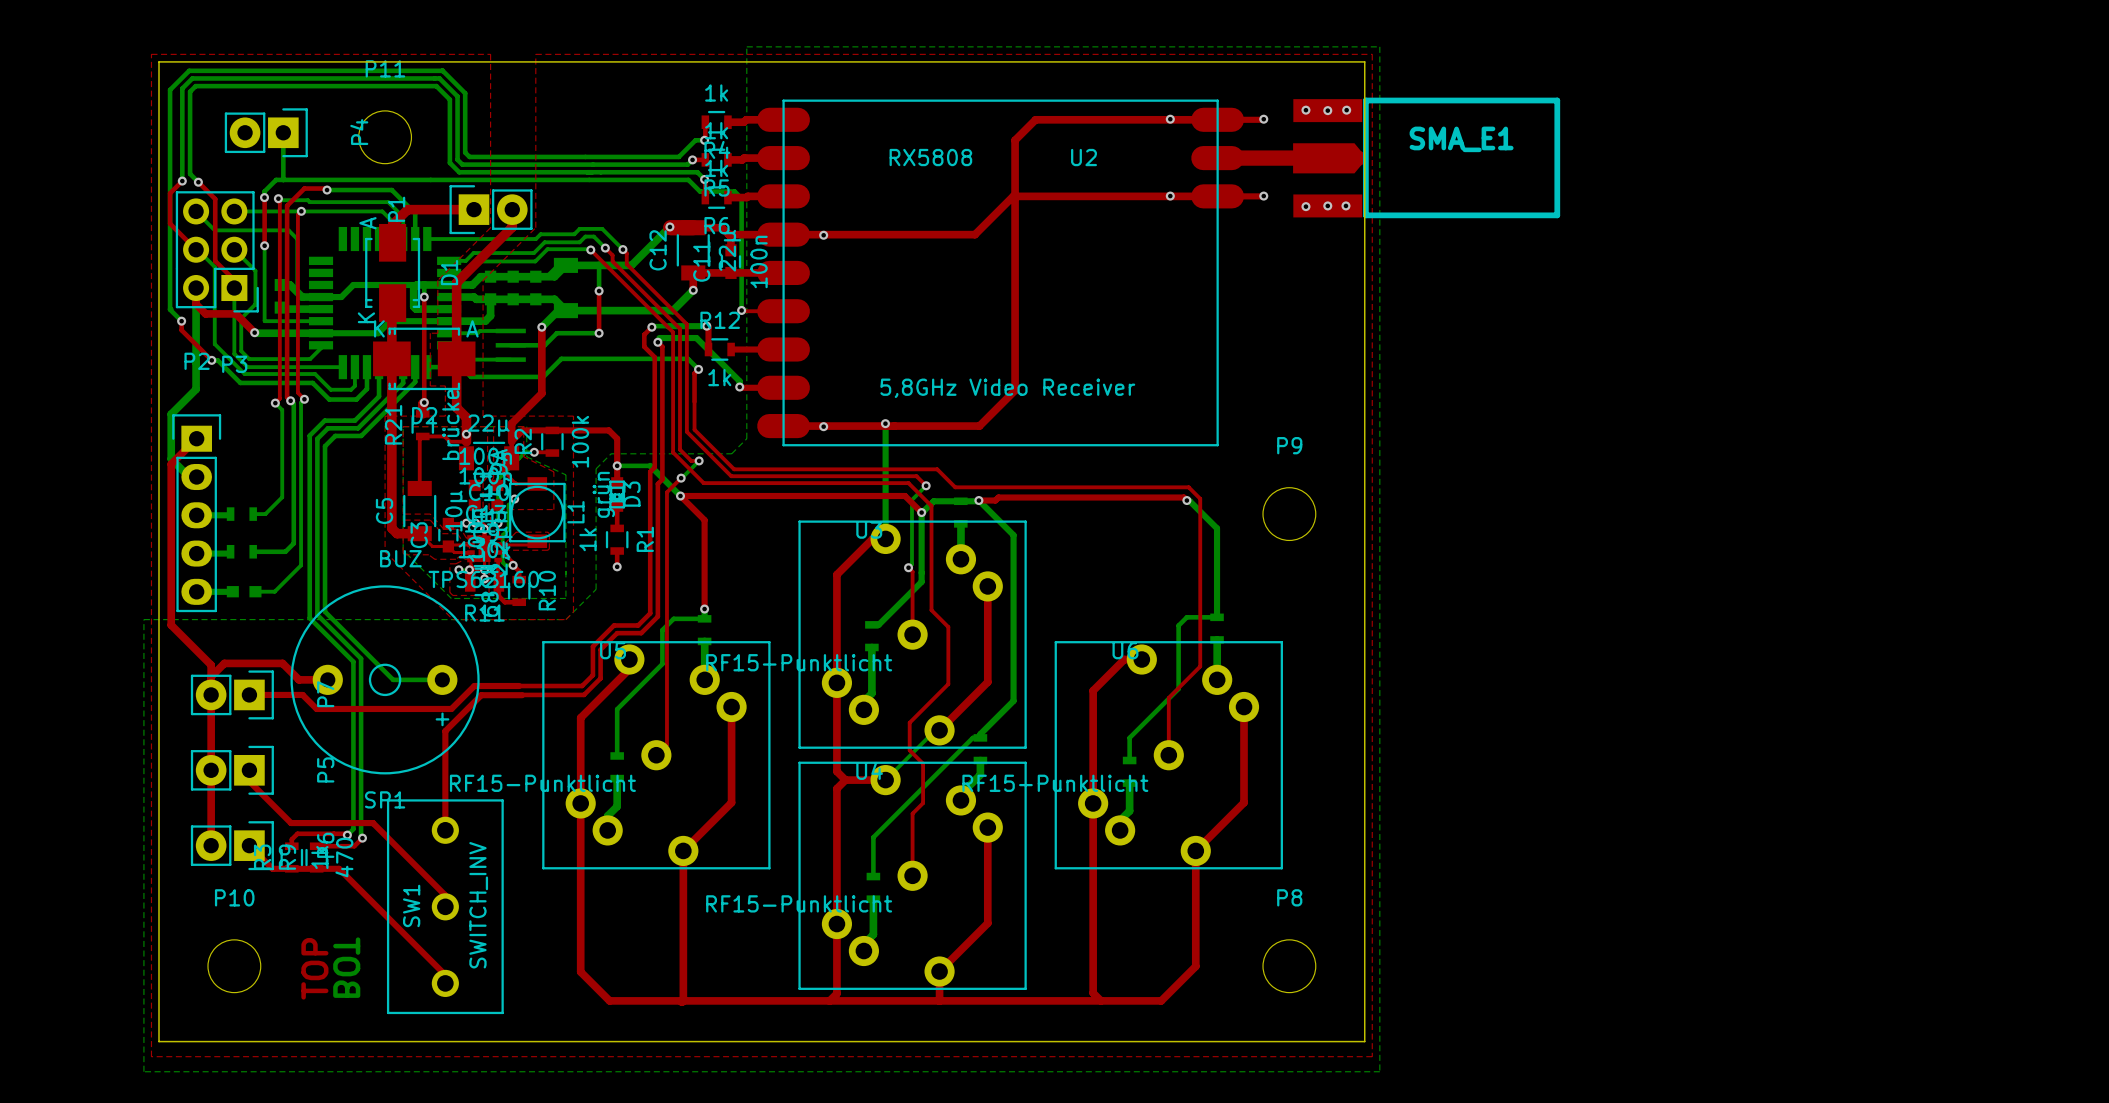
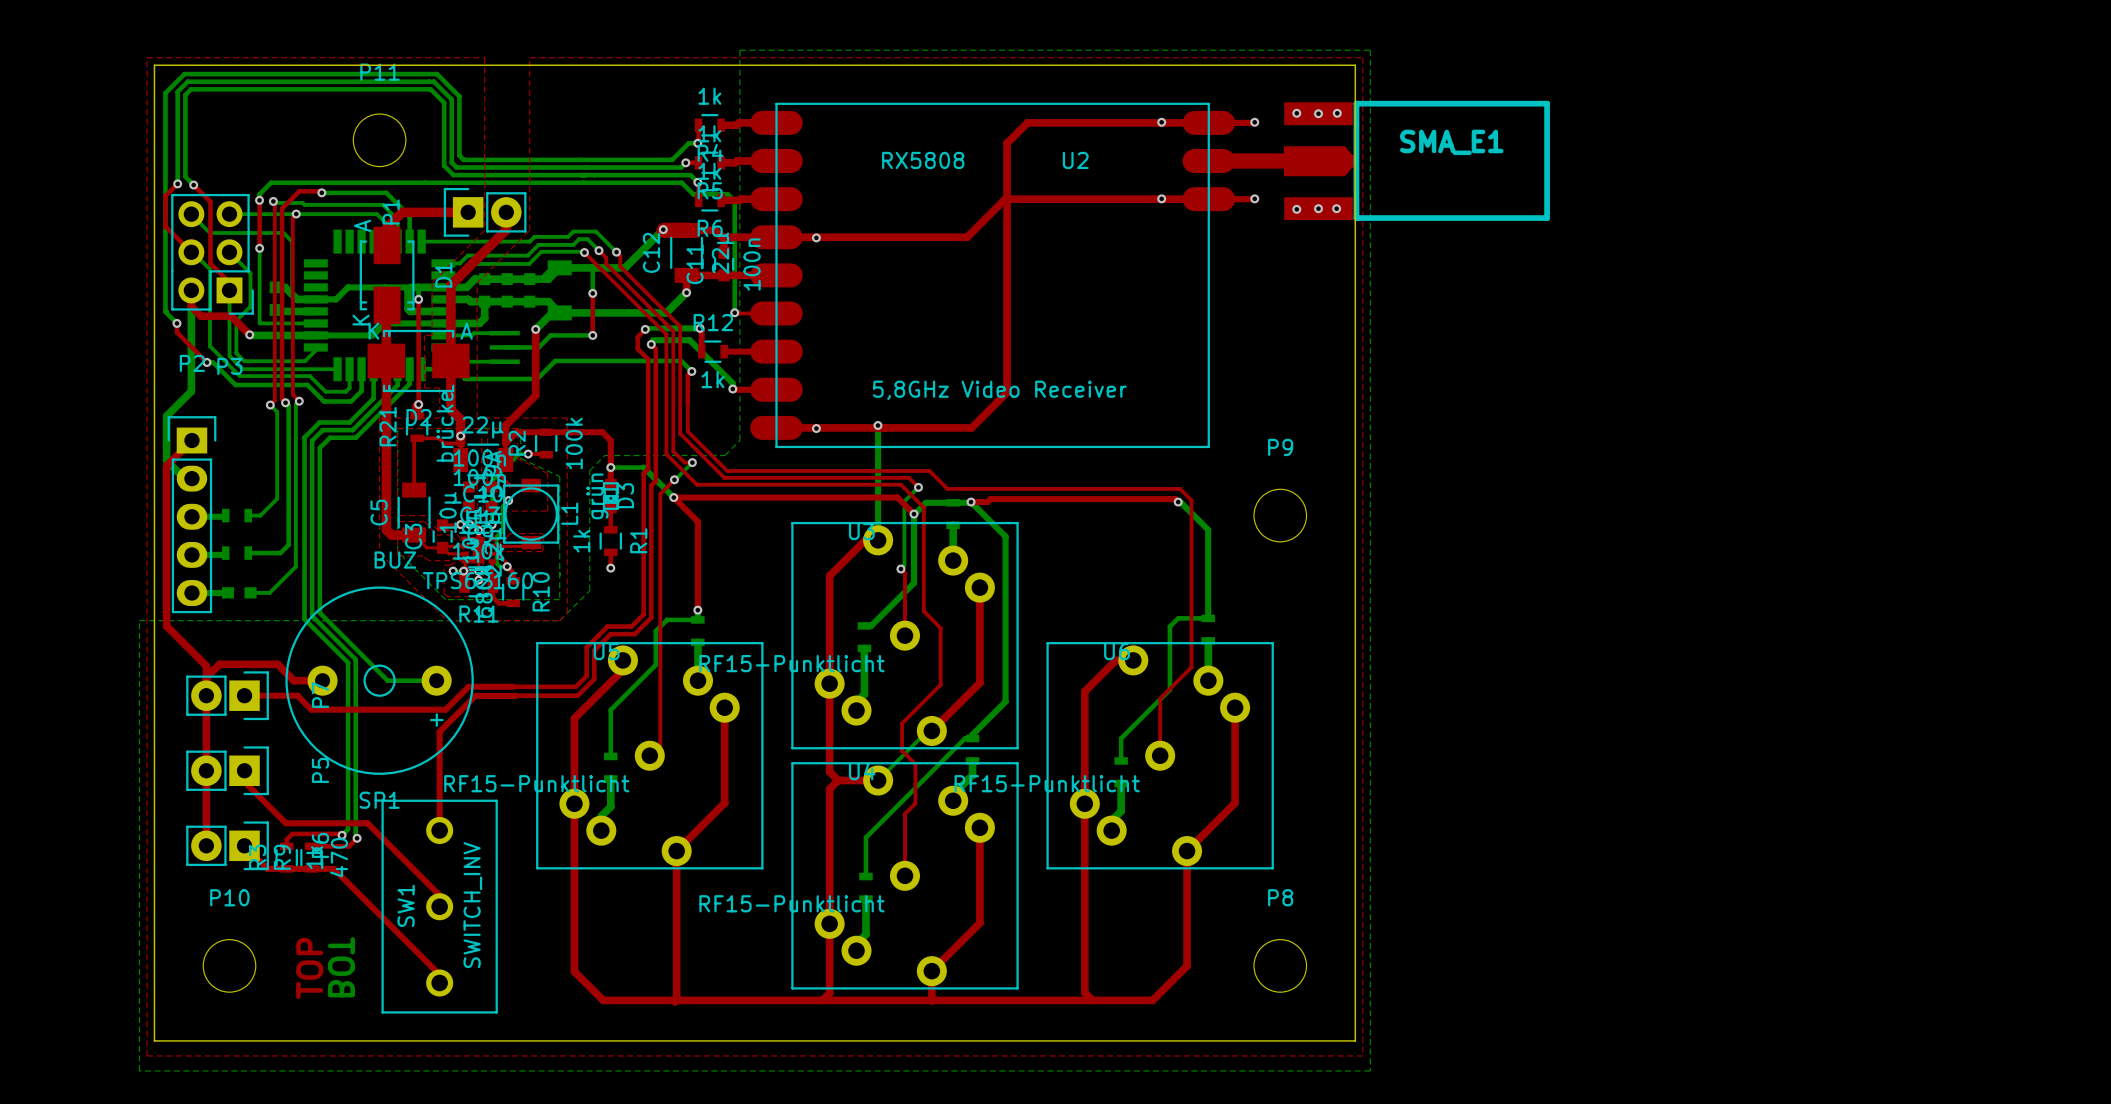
P4: (266, 132) -> none
bottom track: (283, 132) (283, 179) -> none

